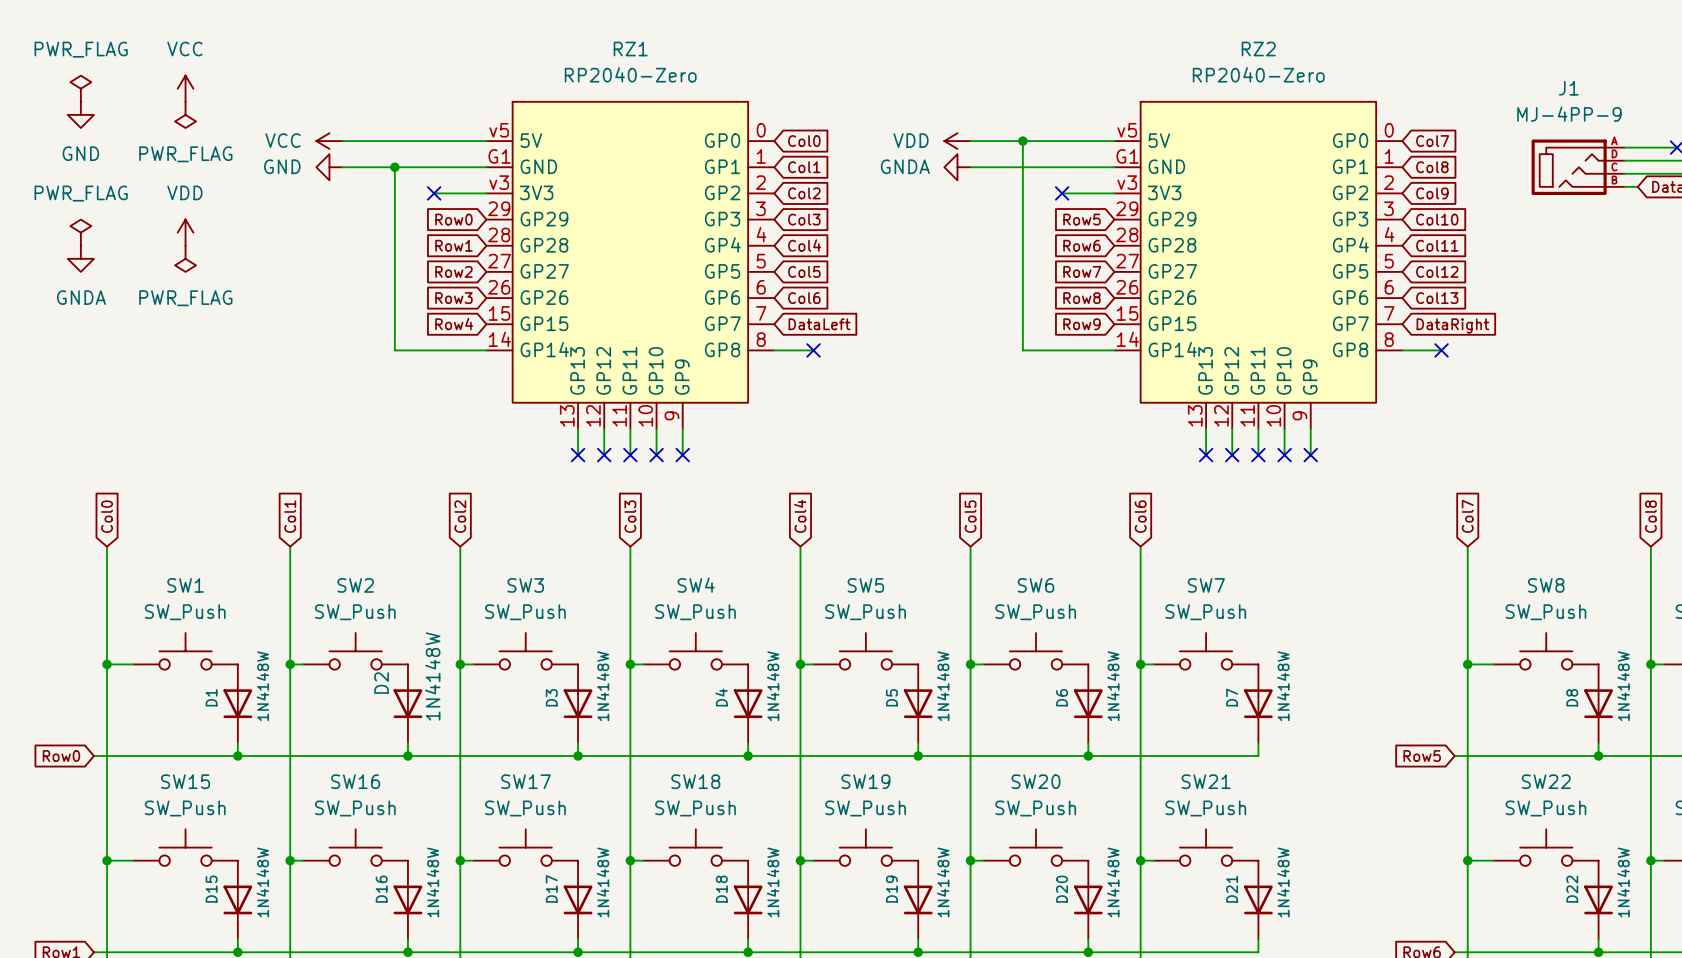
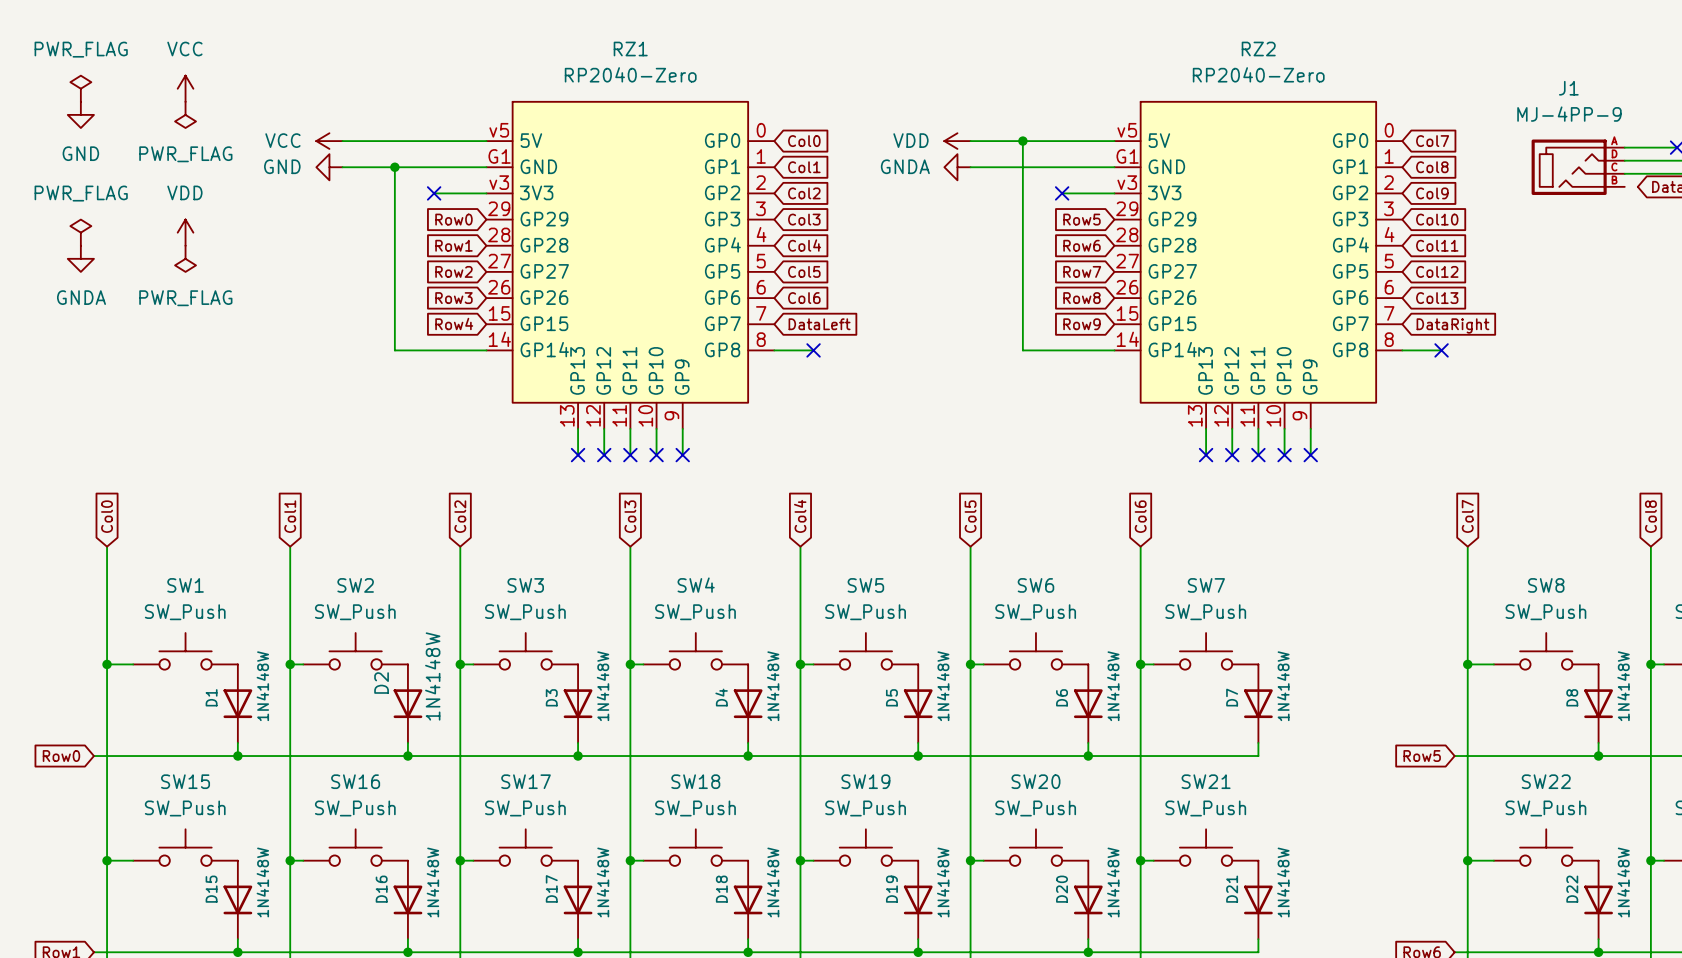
wire: (1624, 186) (1637, 186) -> none

